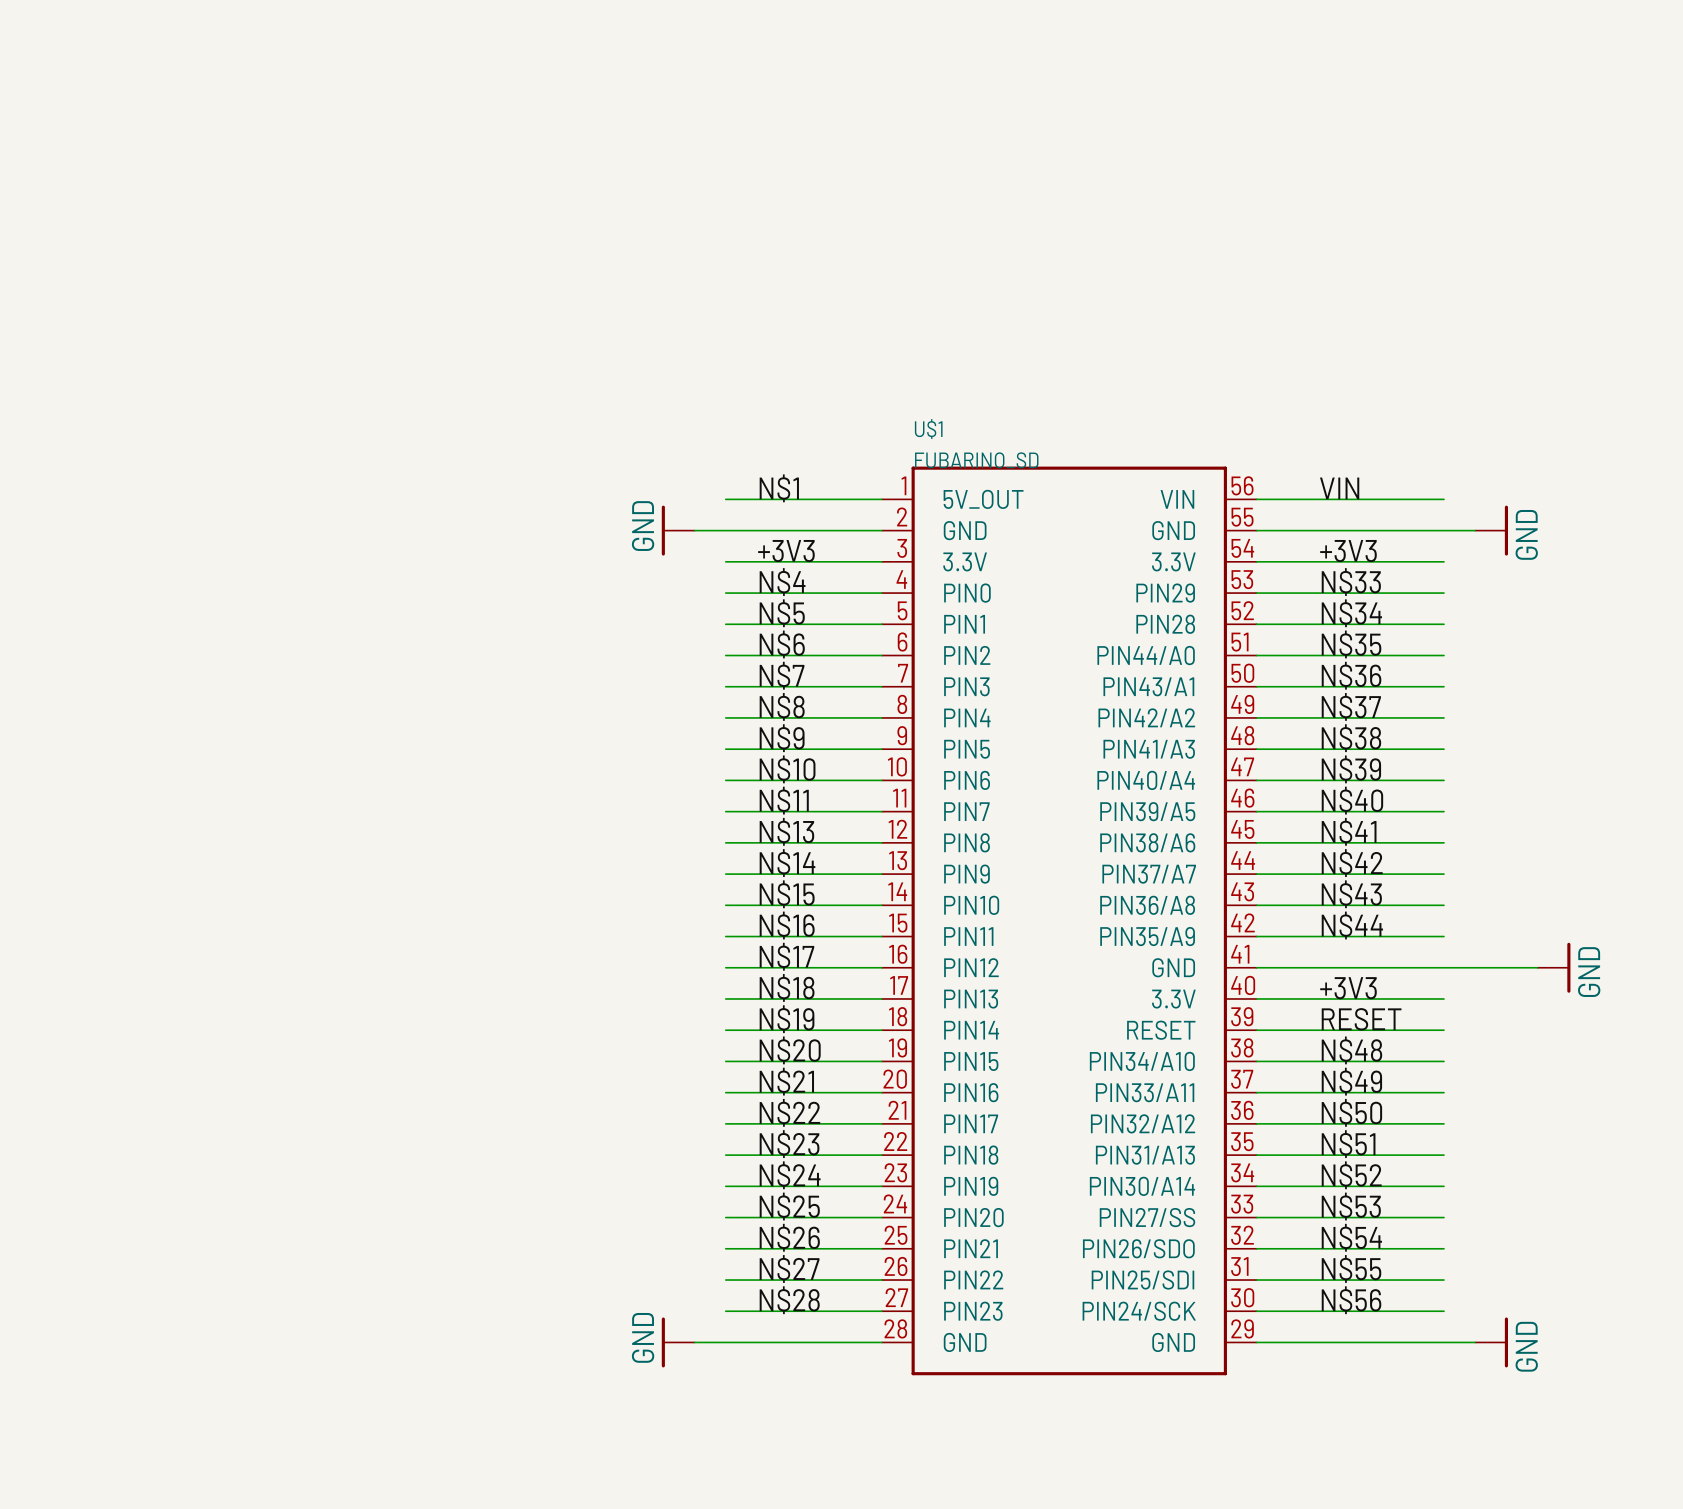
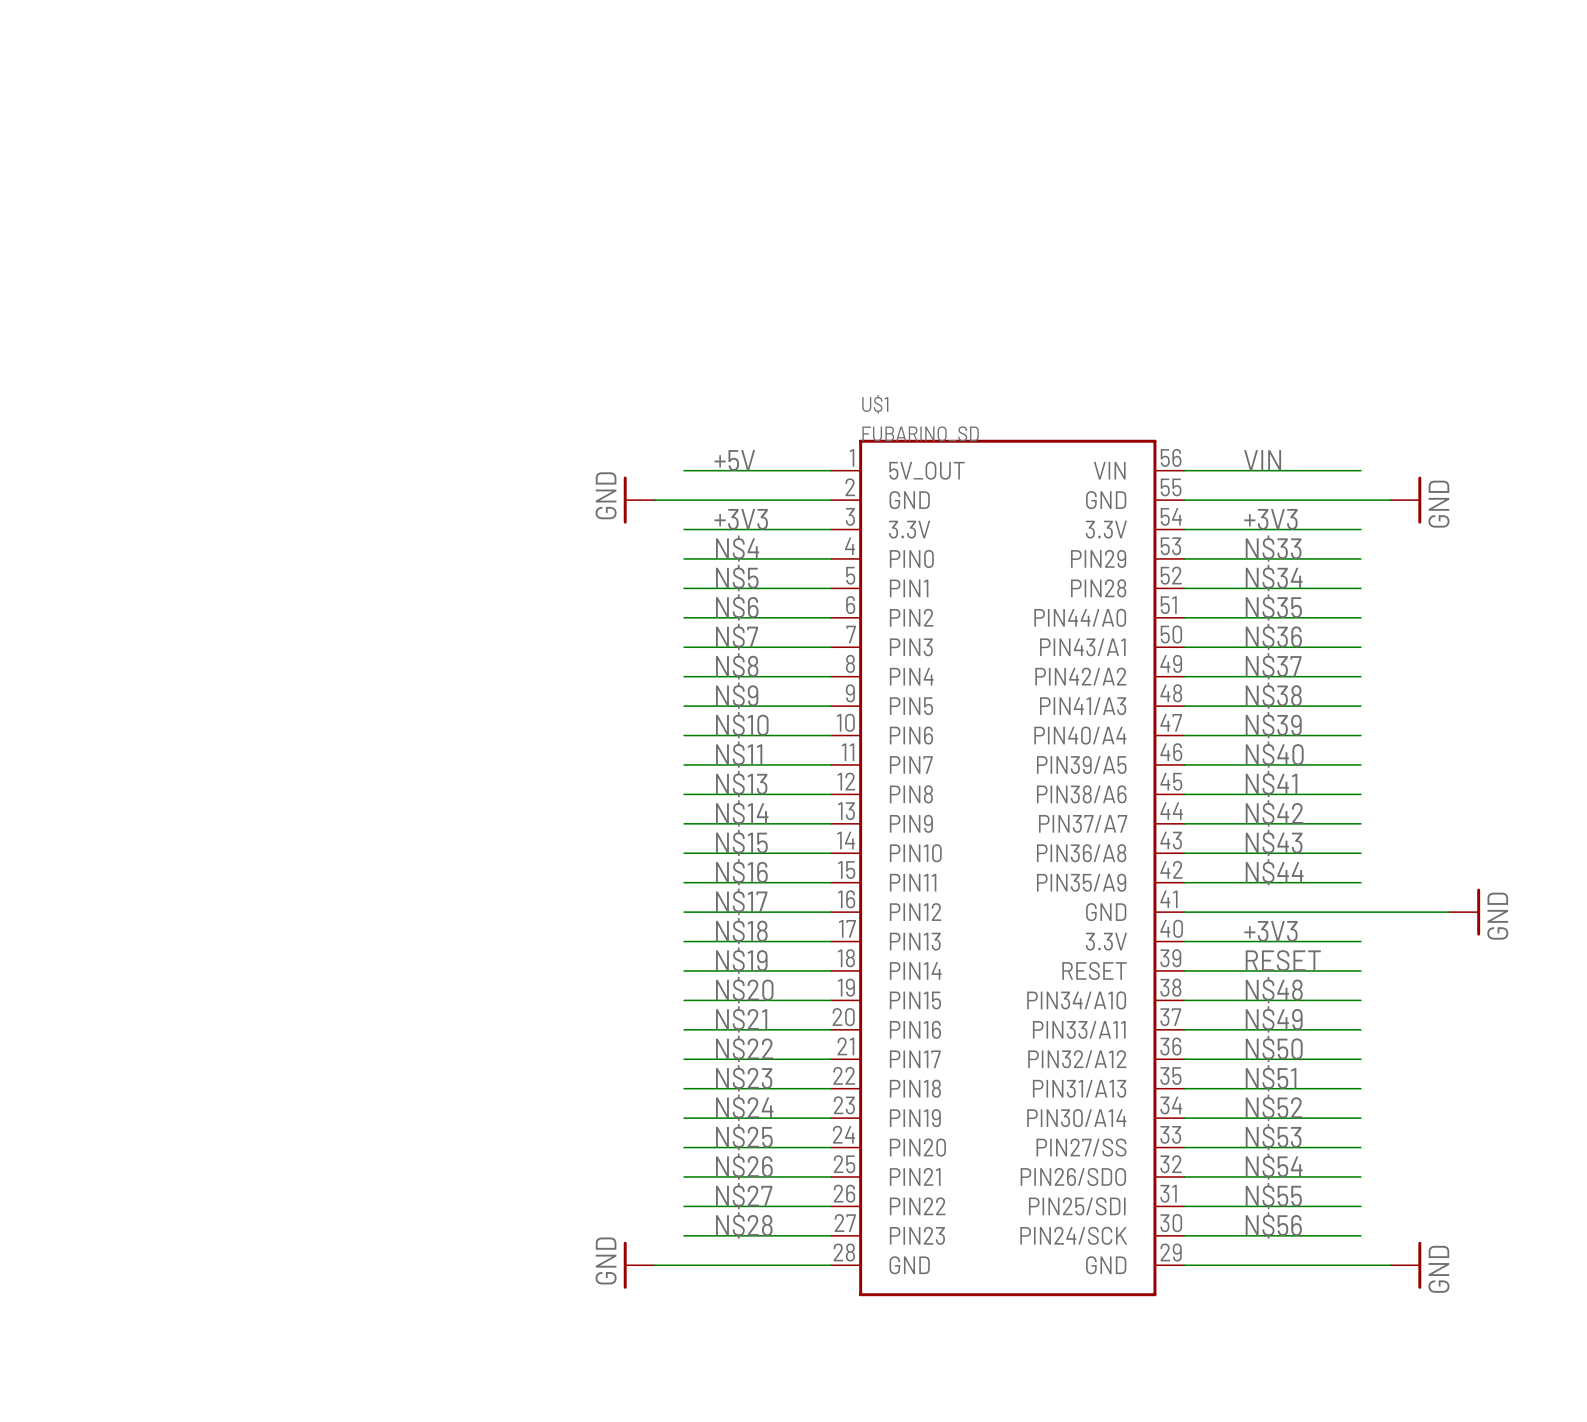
label: N$1 (779, 488) -> +5V (734, 460)

